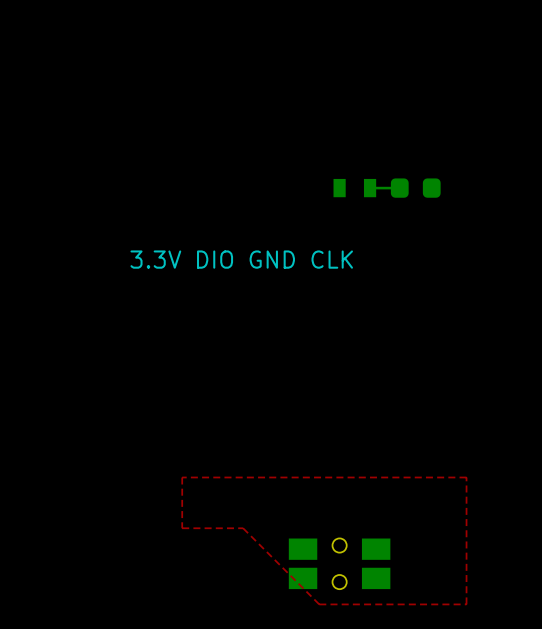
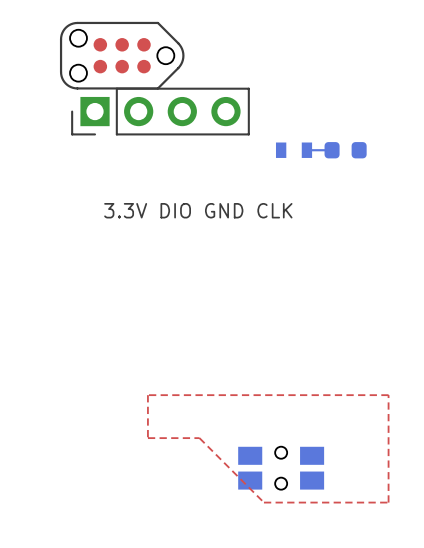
part: none -> (122, 55)
part: none -> (160, 111)

